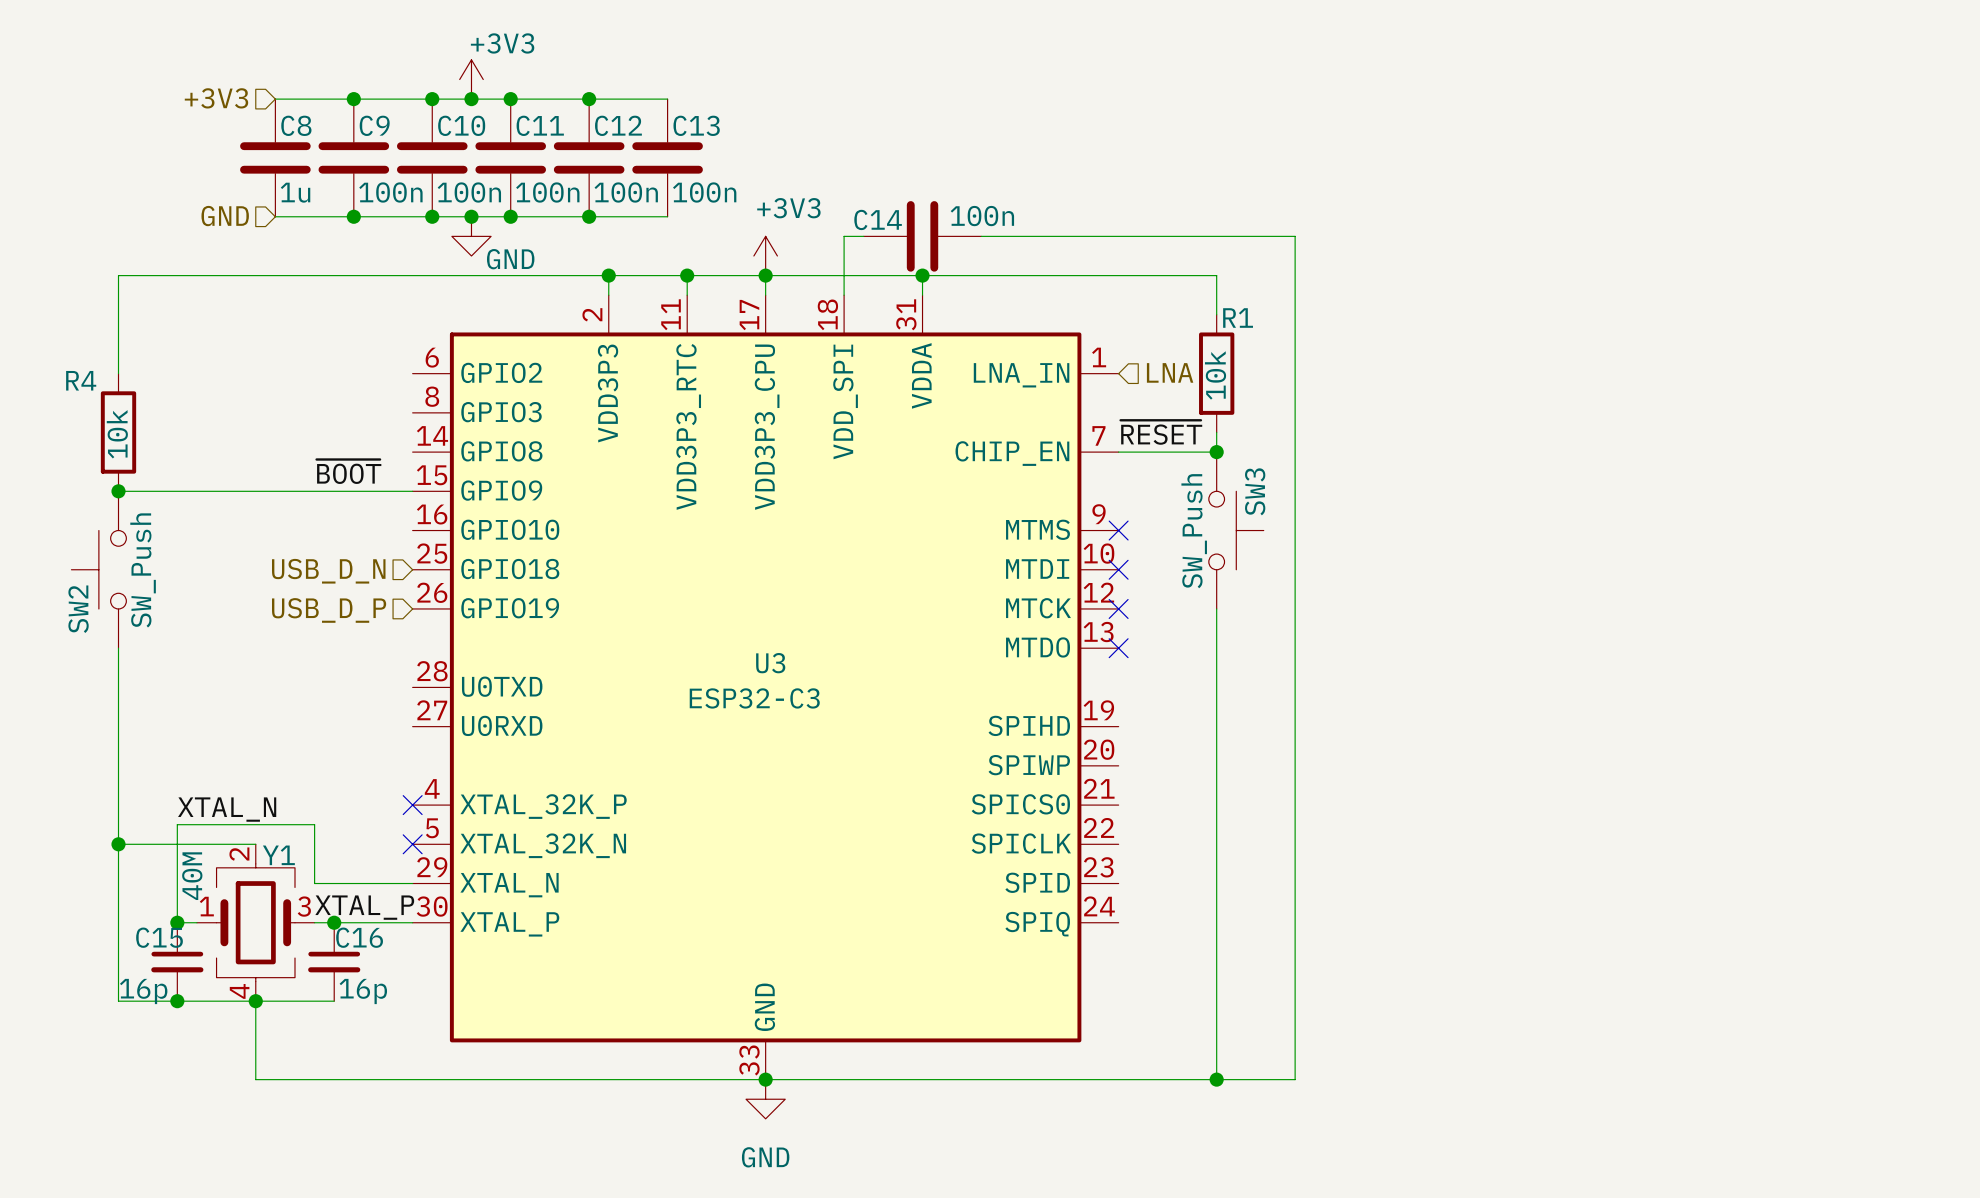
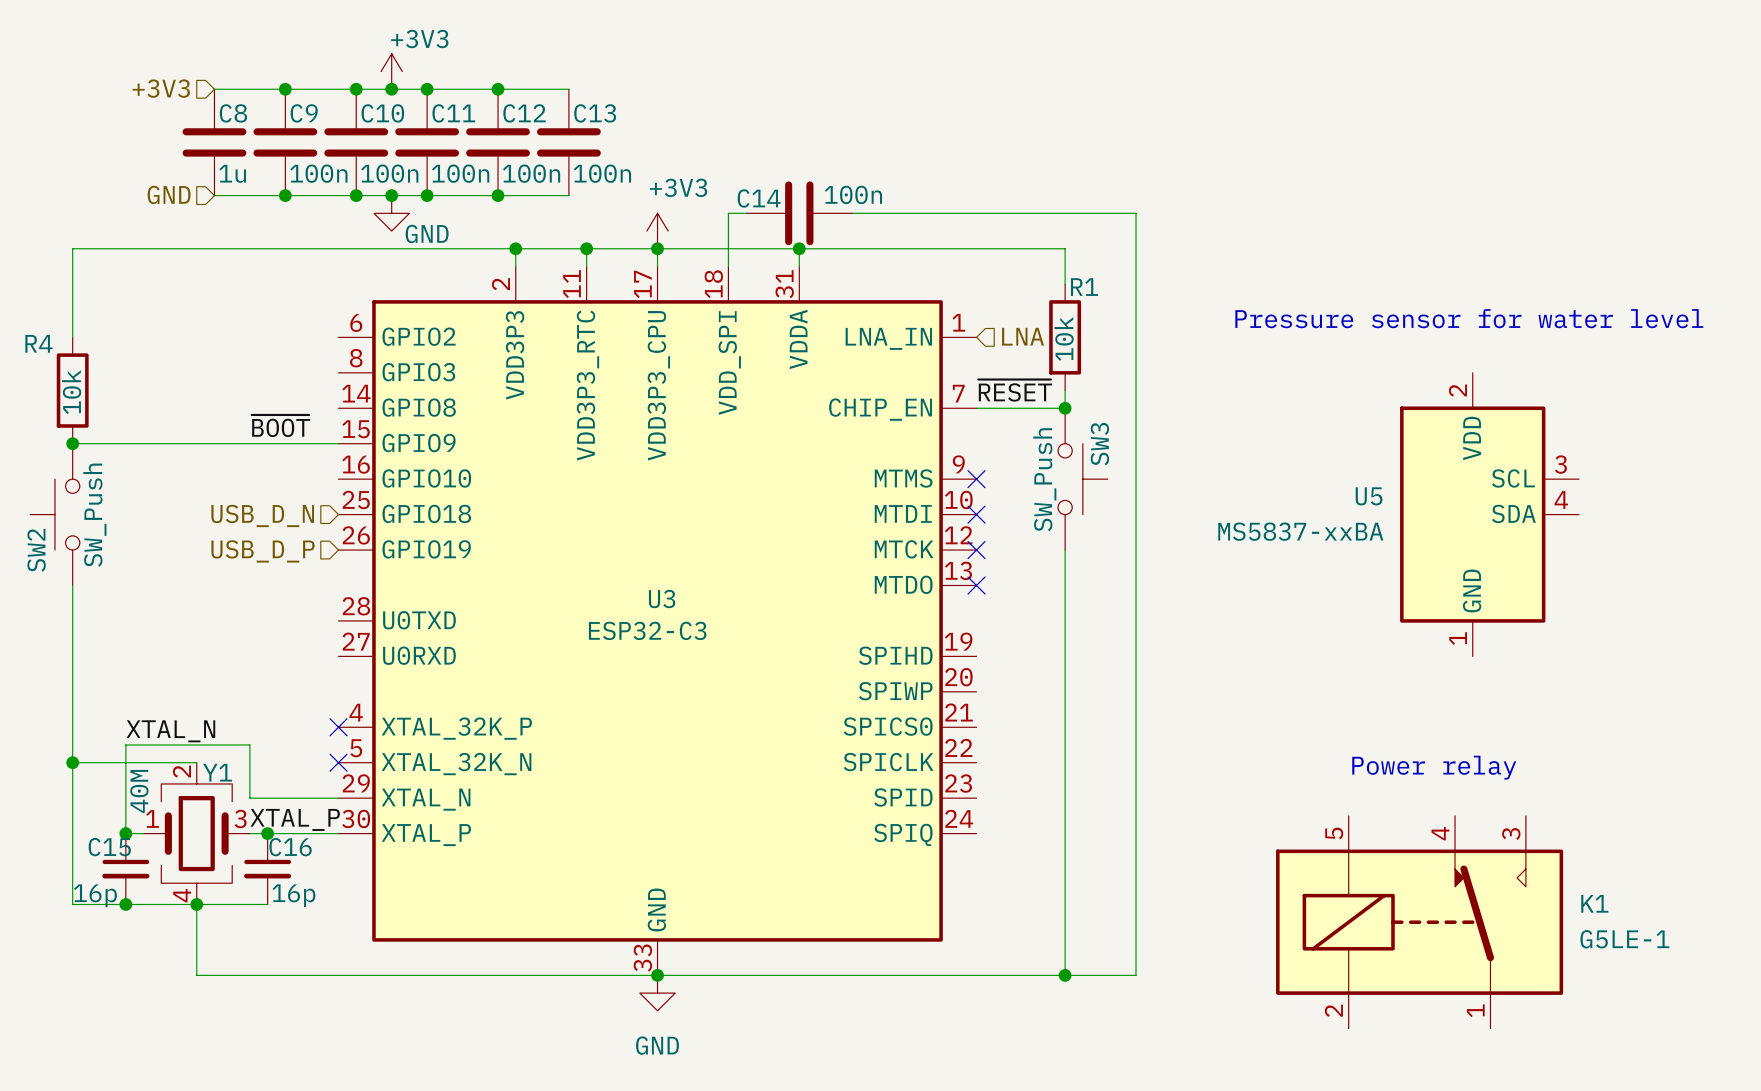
text: none -> Pressure sensor for water level (1469, 318)
U5: none -> MS5837-xxBA (1489, 514)
text: none -> Power relay (1434, 767)
K1: none -> G5LE-1 (1419, 922)

